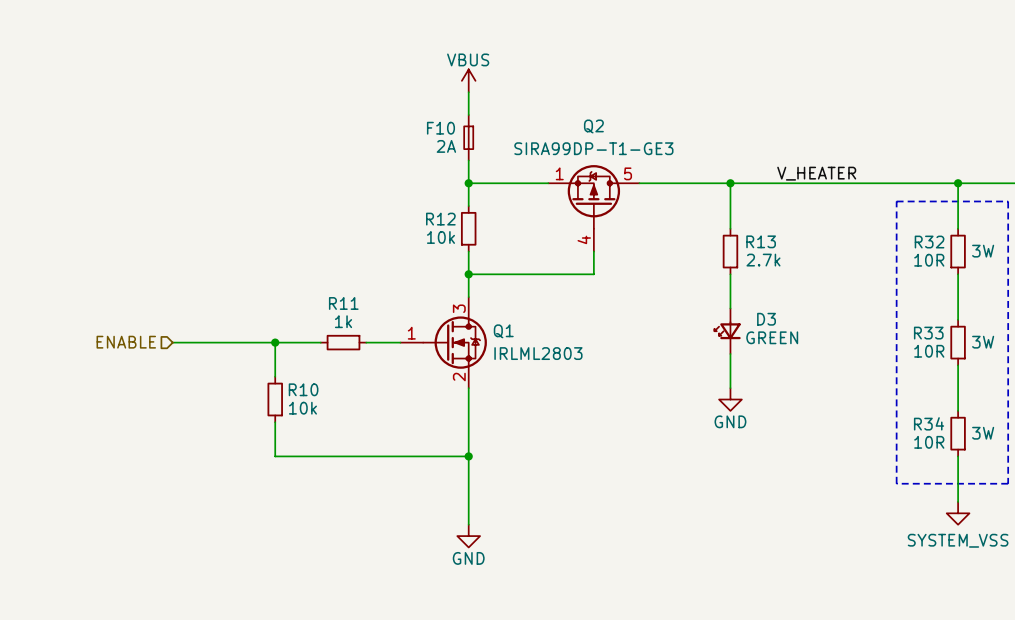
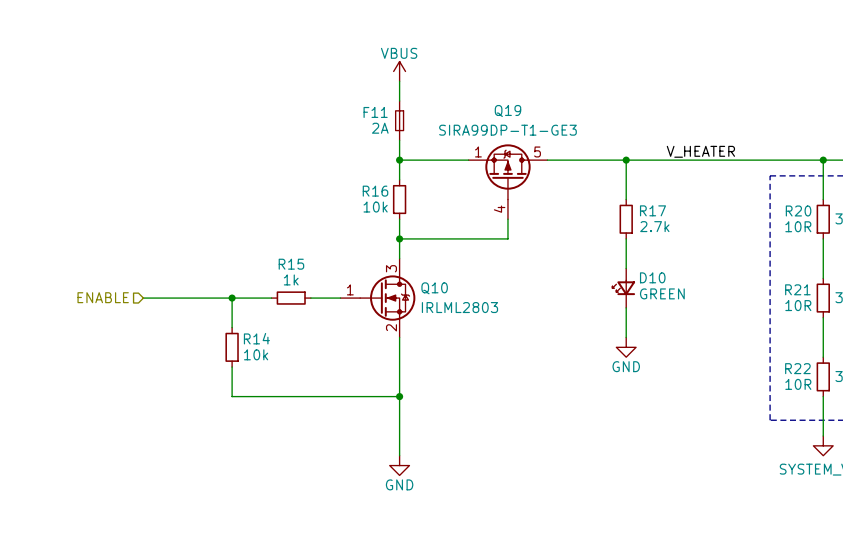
Q2 name: Q2 (593, 126) -> Q19 (507, 110)
F10 name: F10 (440, 128) -> F11 (375, 112)
R12 name: R12 (440, 219) -> R16 (375, 191)
R13 name: R13 (761, 241) -> R17 (652, 210)
R32 name: R32 (929, 242) -> R20 (798, 210)
R11 name: R11 (343, 303) -> R15 (291, 264)
D3 name: D3 (766, 319) -> D10 (652, 277)
Q1 name: Q1 (503, 331) -> Q10 (434, 288)
R33 name: R33 (928, 333) -> R21 (797, 289)
R10 name: R10 (303, 389) -> R14 (256, 338)
R34 name: R34 (929, 423) -> R22 (797, 368)

